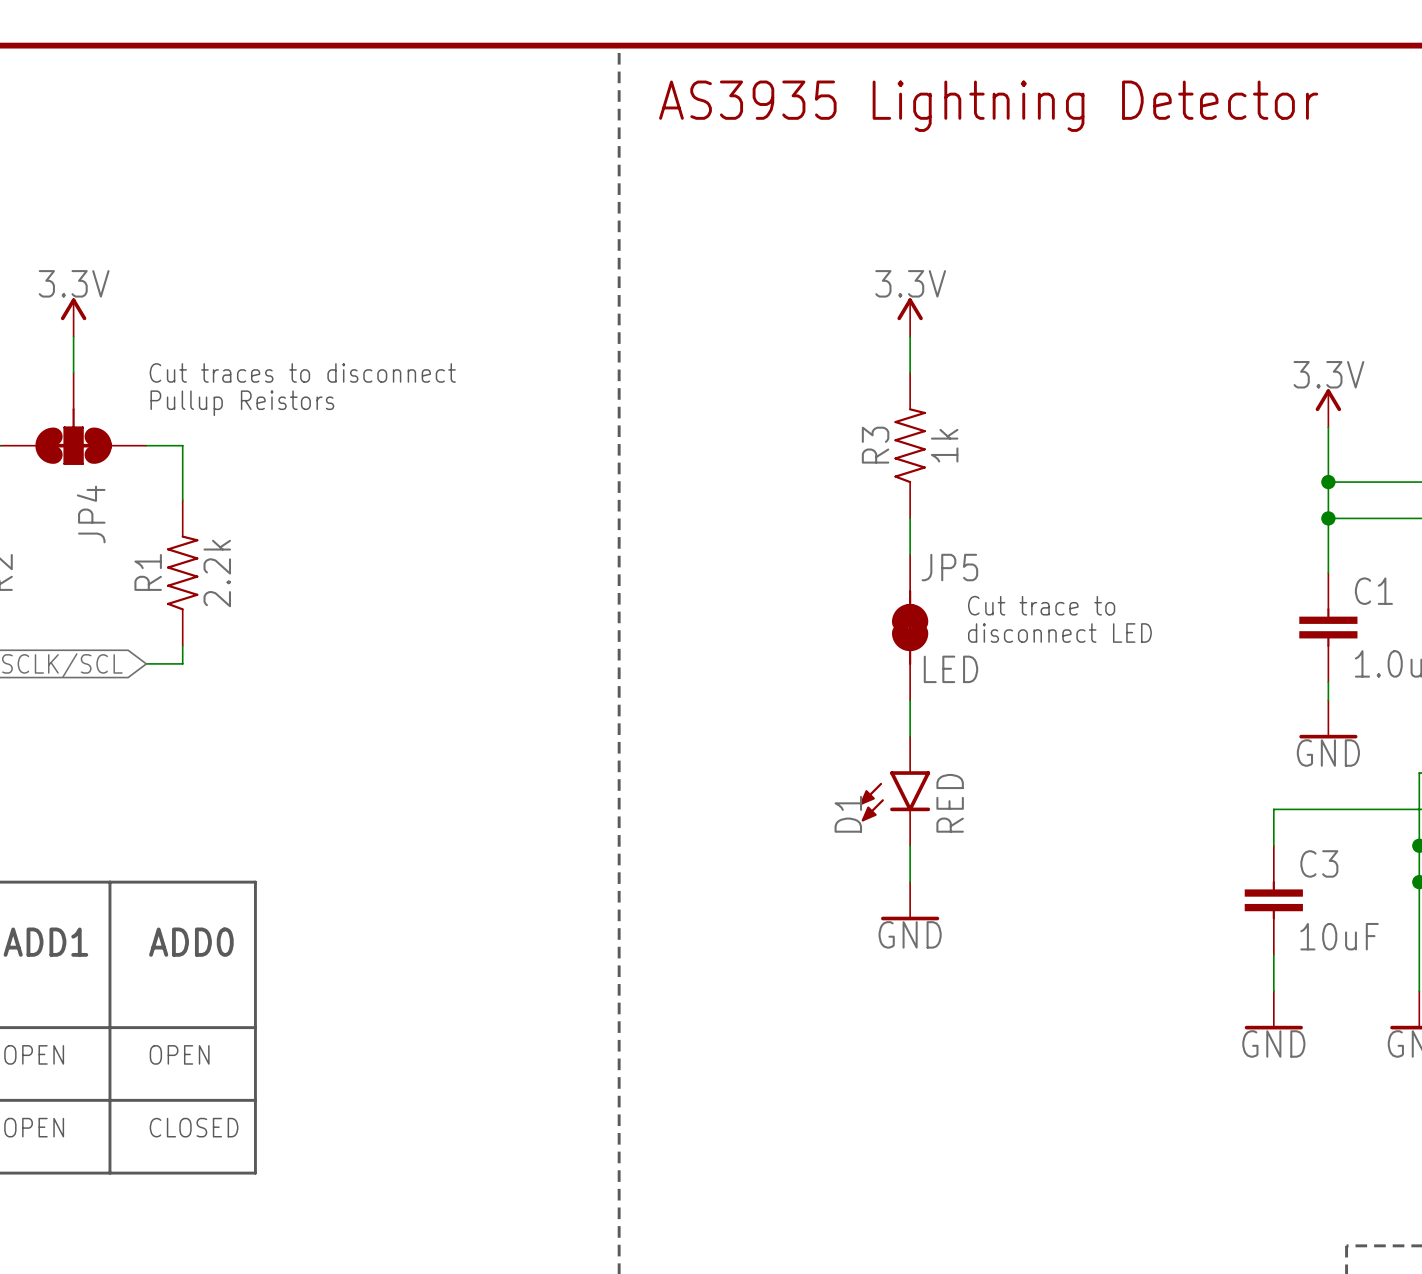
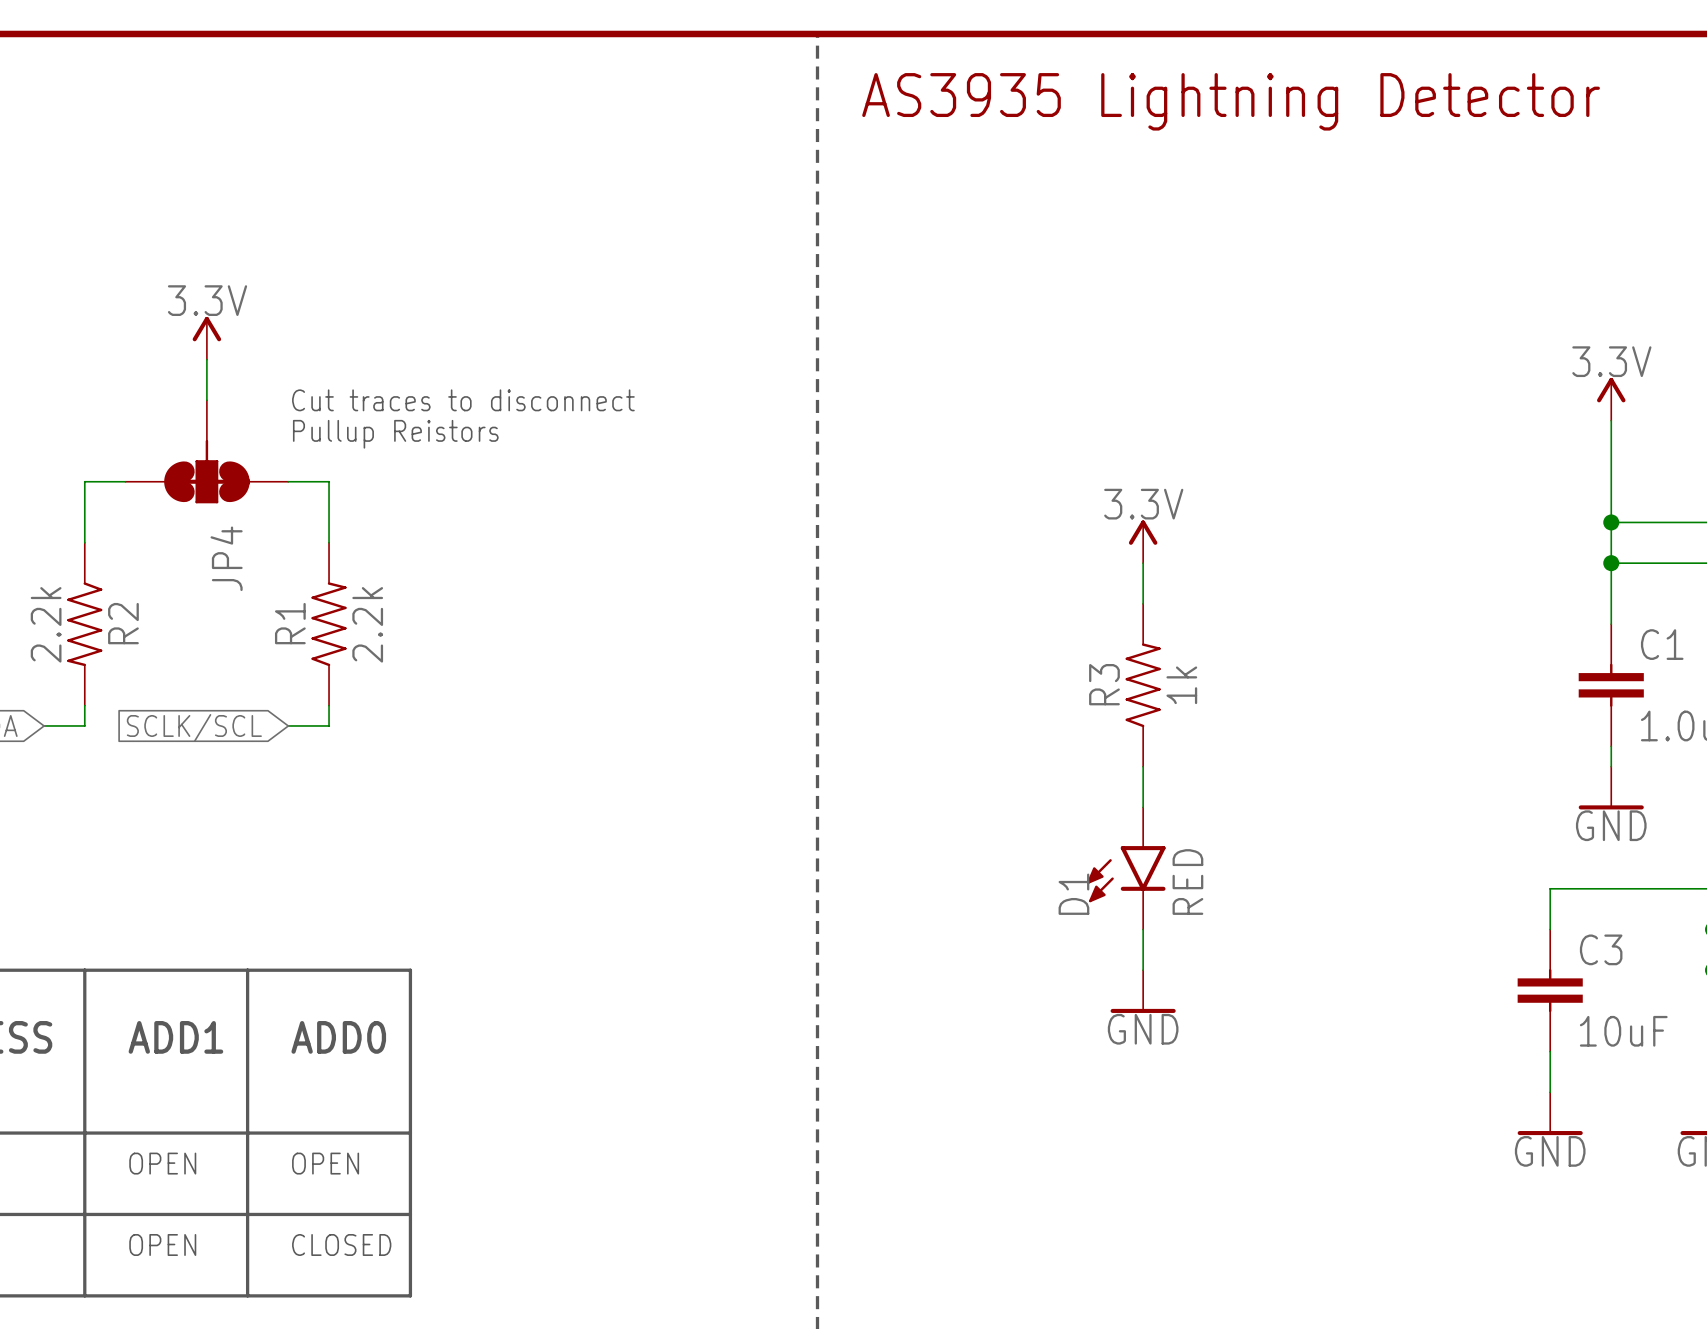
power symbol position: 3.3V (910, 317) -> 3.3V (1143, 541)
wire: (910, 336) (910, 372) -> none
power symbol position: 3.3V (1328, 408) -> 3.3V (1611, 399)
R3 position: (910, 445) -> (1143, 685)
text: Cut trace to (1041, 605) -> none
JP5: LED (910, 627) -> none
text: disconnect LED (1059, 632) -> none

